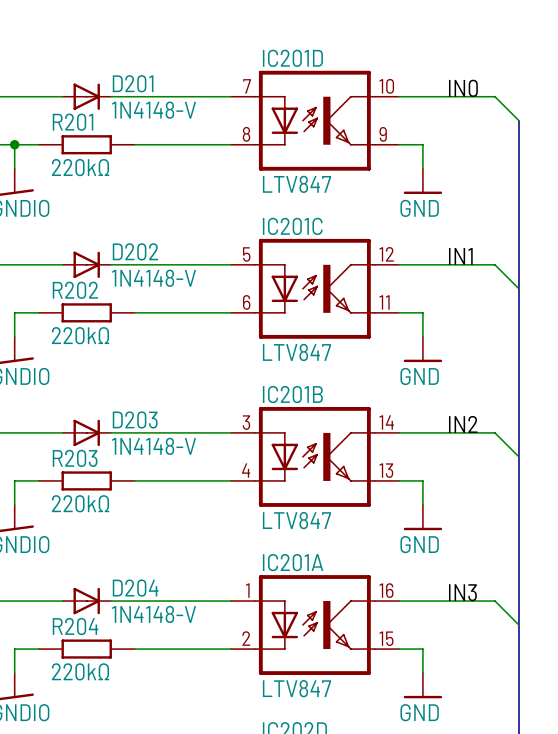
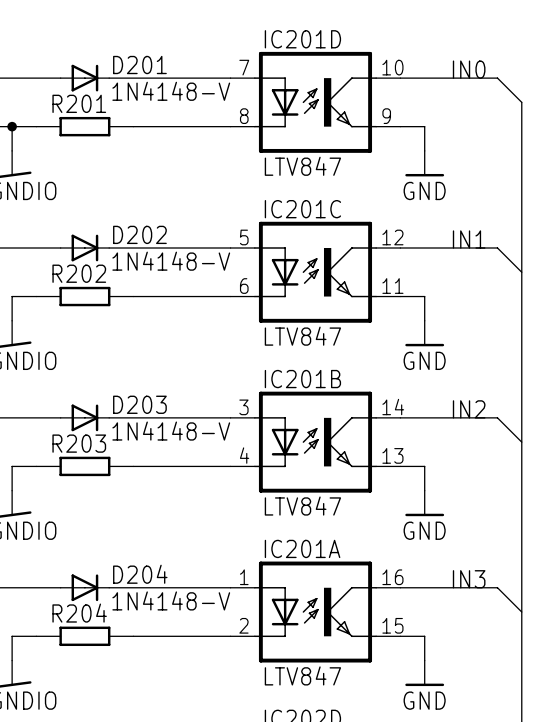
R201 value: 220kΩ (80, 167) -> none
R202 value: 220kΩ (80, 335) -> none
R203 value: 220kΩ (80, 503) -> none
R204 value: 220kΩ (80, 671) -> none

